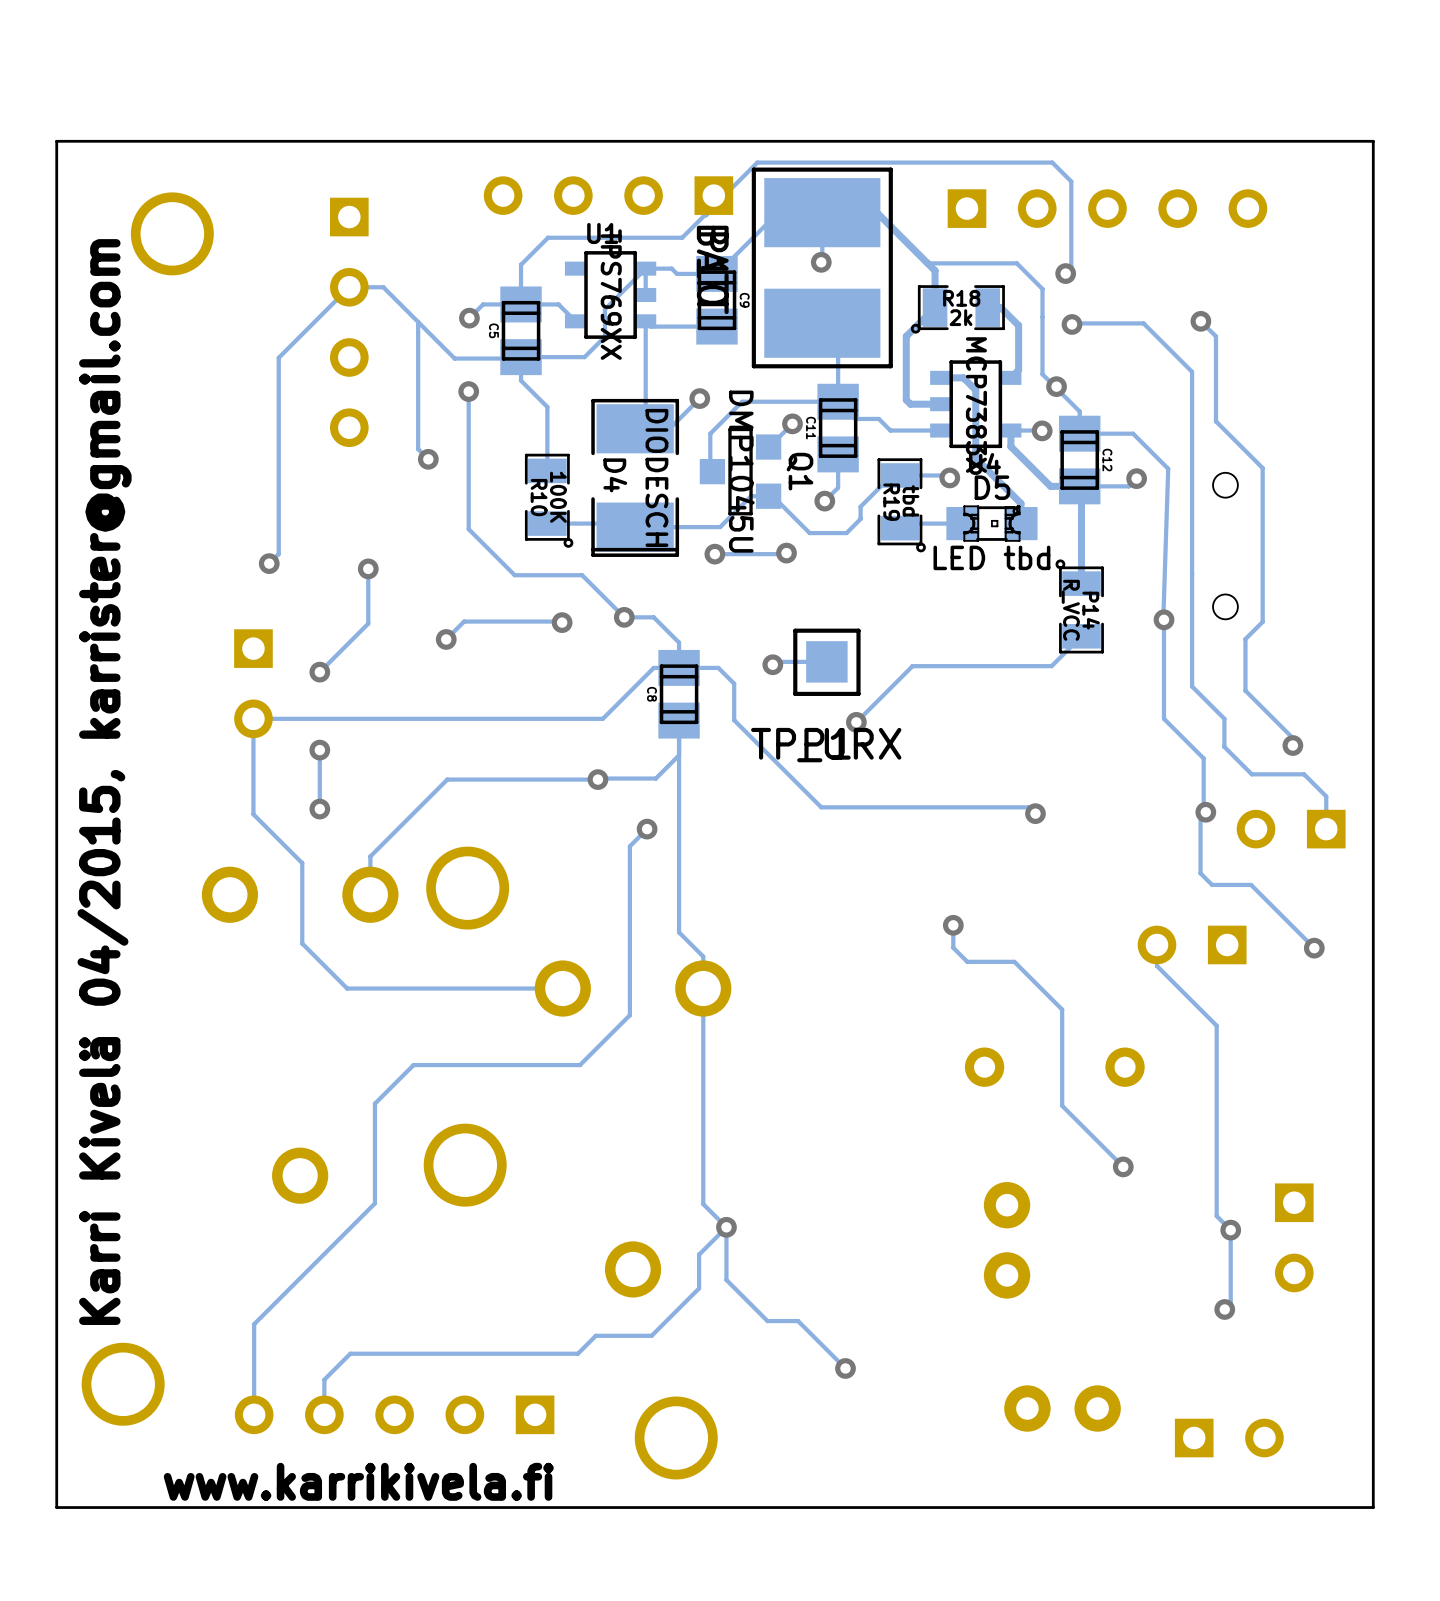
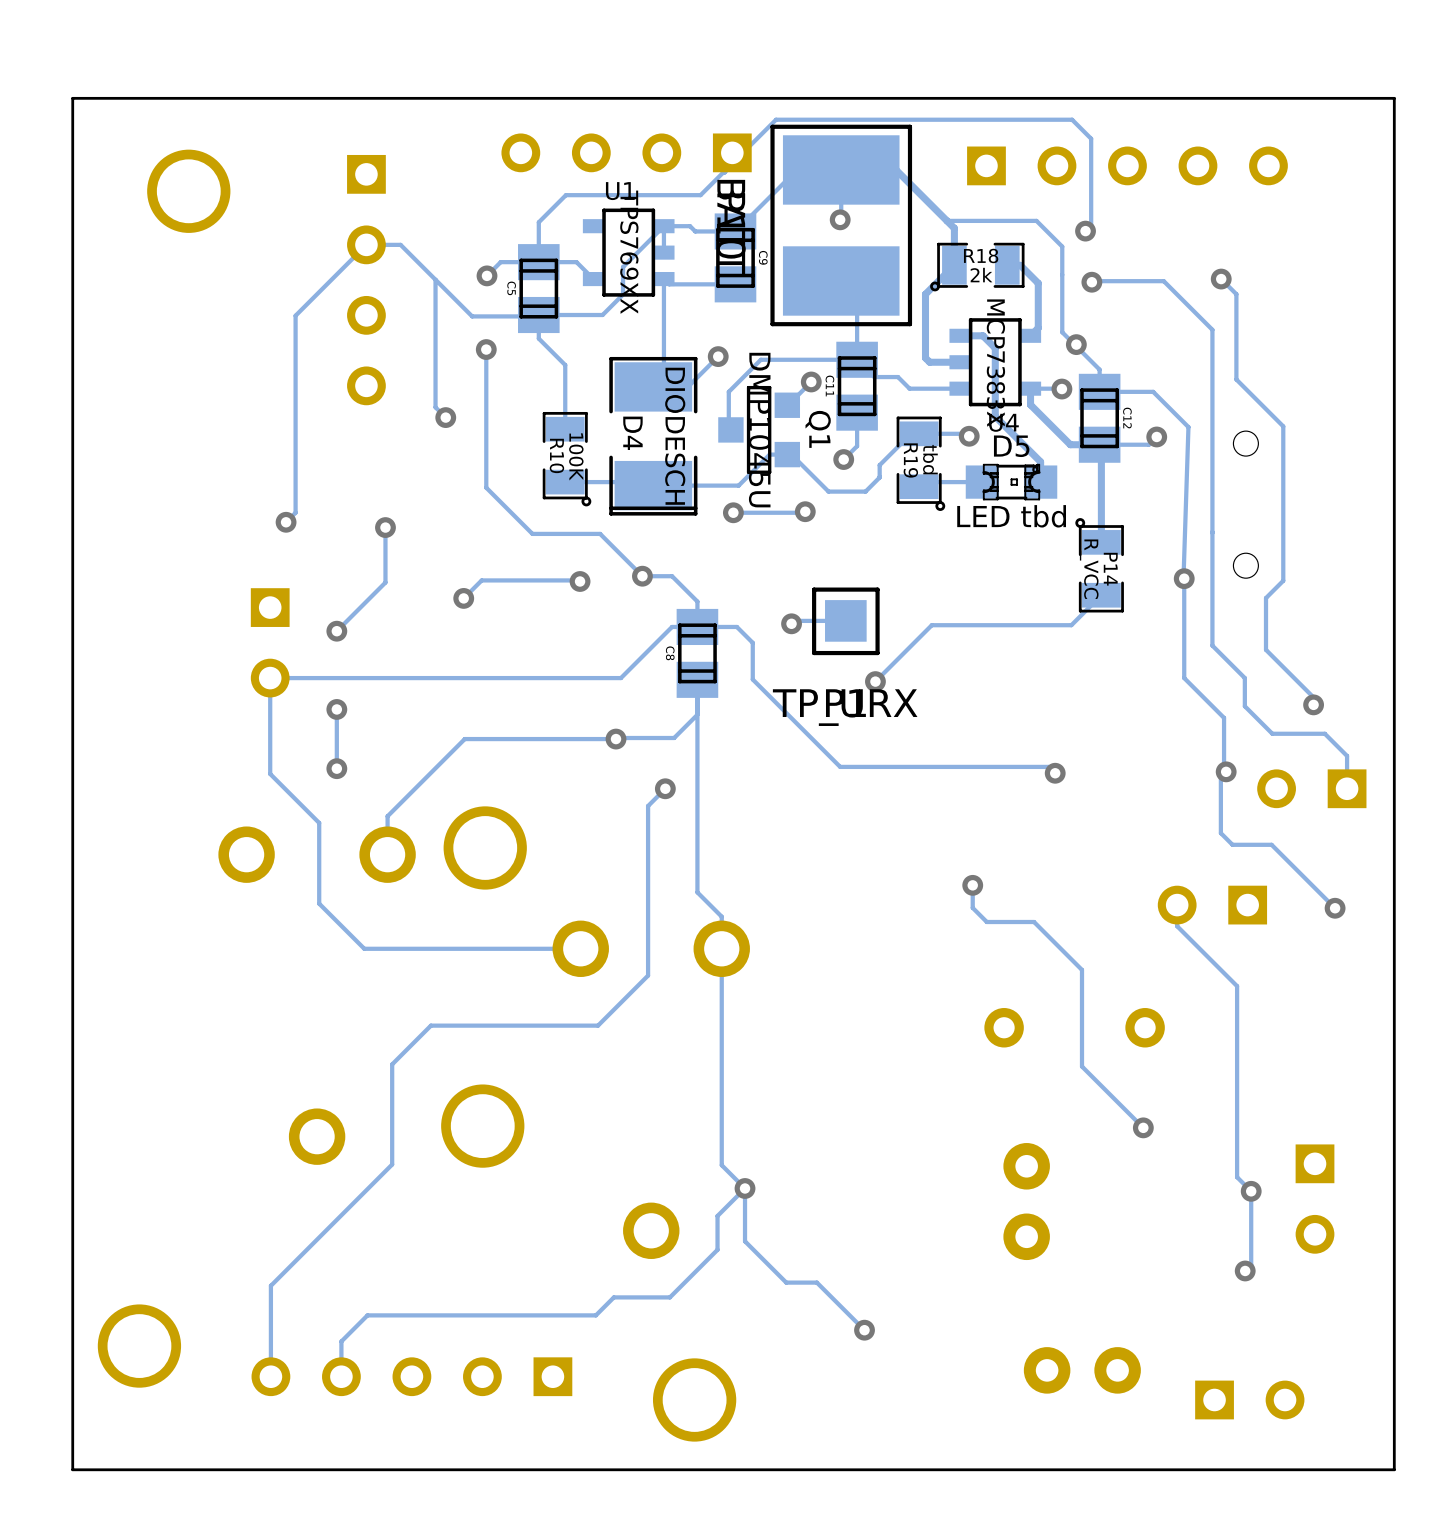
text: Karri Kivelä 04/2015, karrister@gmail.com (104, 782) -> none
text: www.karrikivela.fi (358, 1481) -> none

